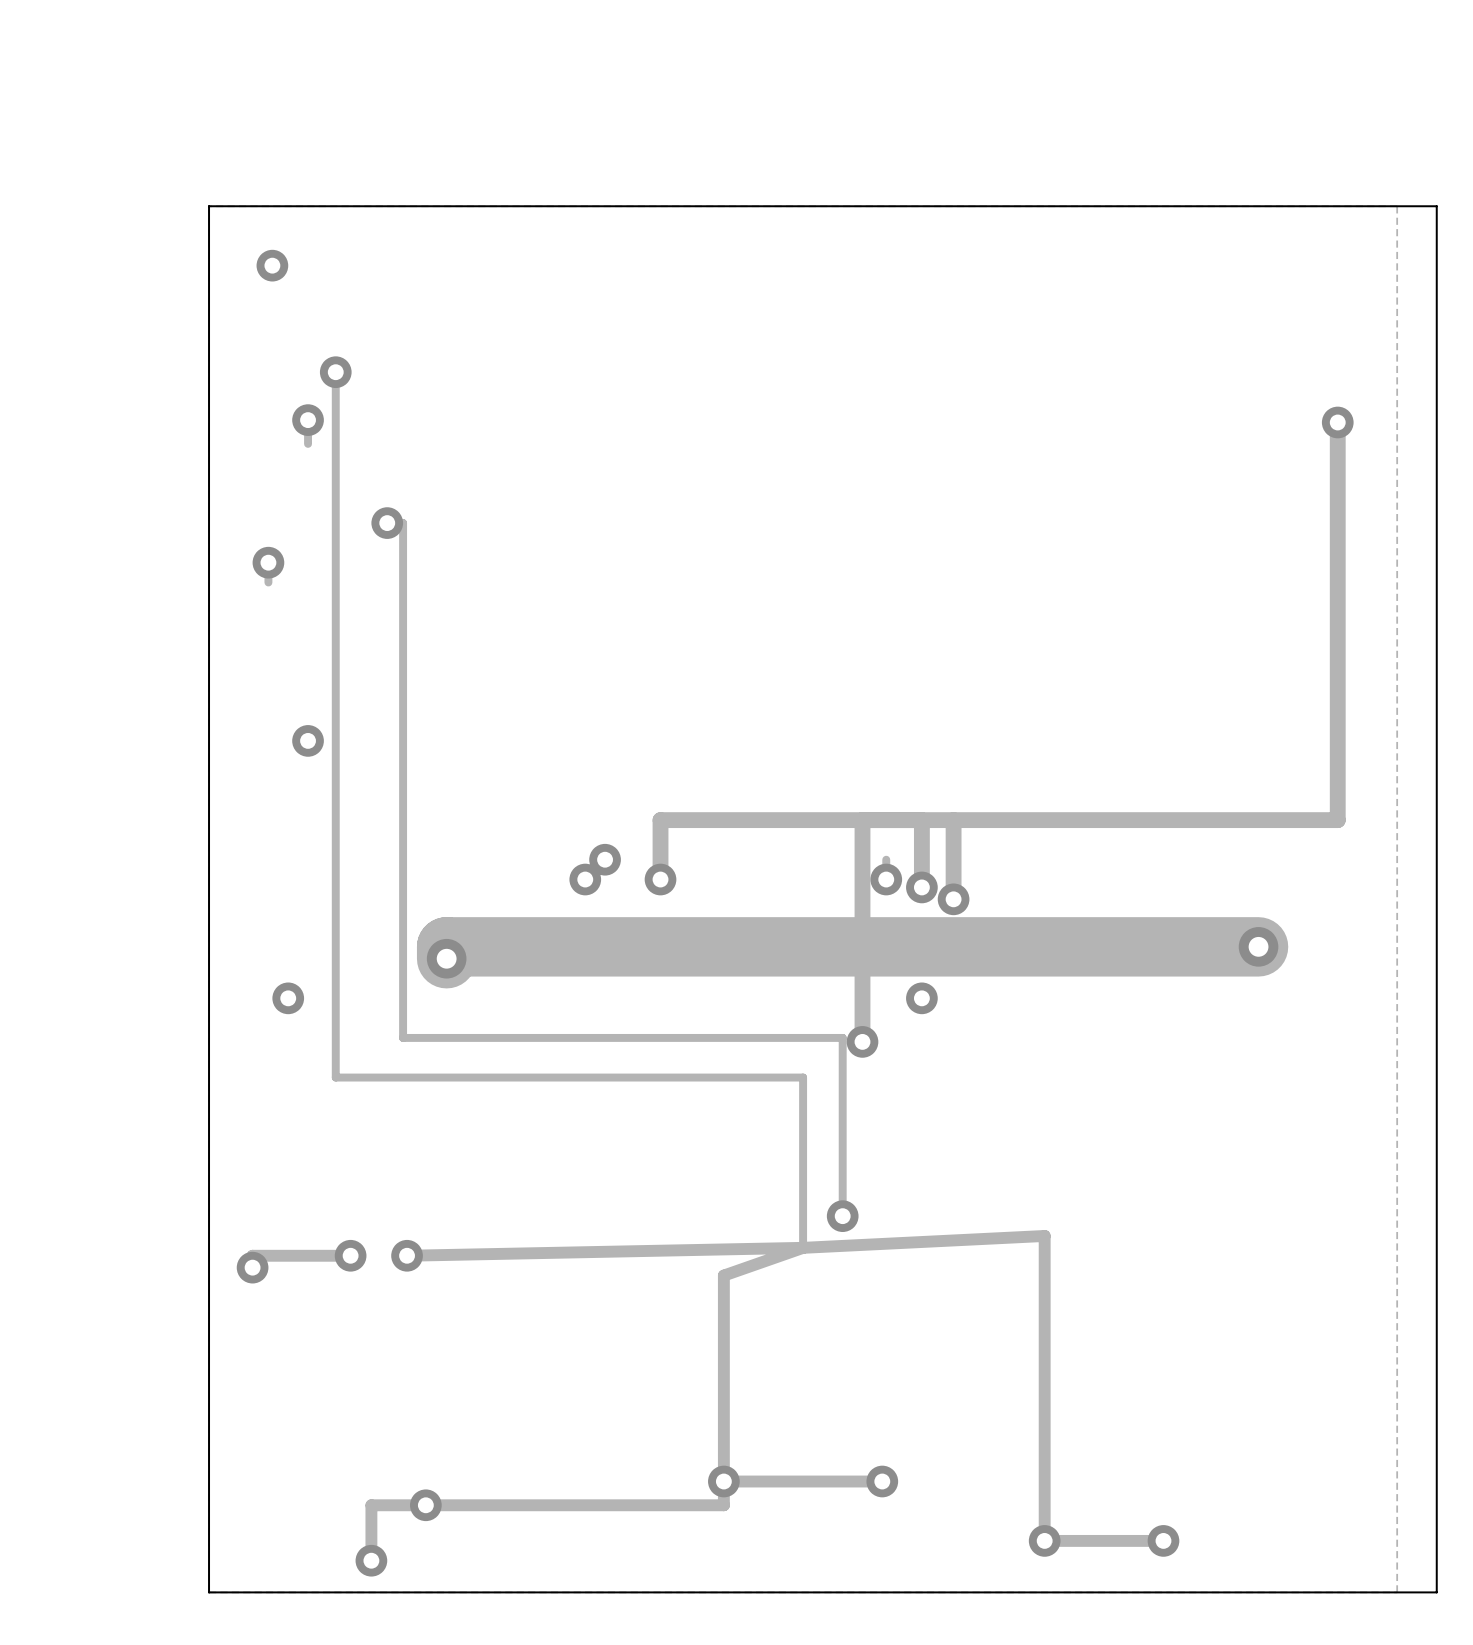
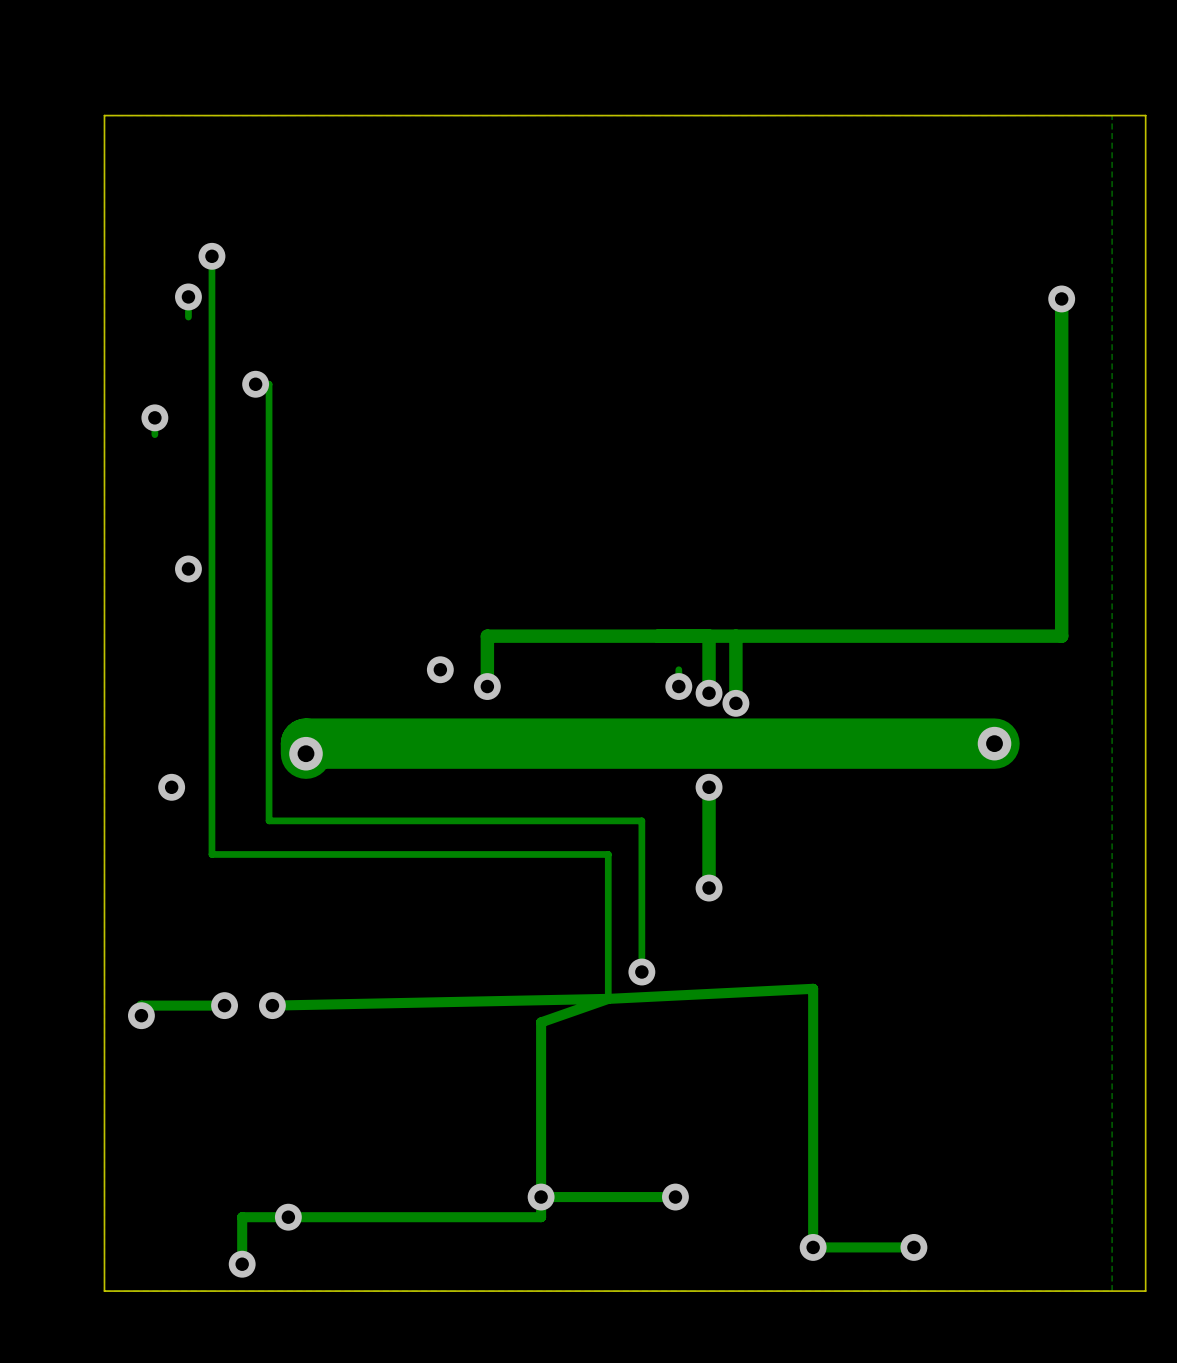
via: (272, 265) -> none
track: (862, 820) (862, 1041) -> none
via: (585, 879) -> none
track: none -> (709, 787) (709, 888)
via position: (862, 1041) -> (709, 888)

